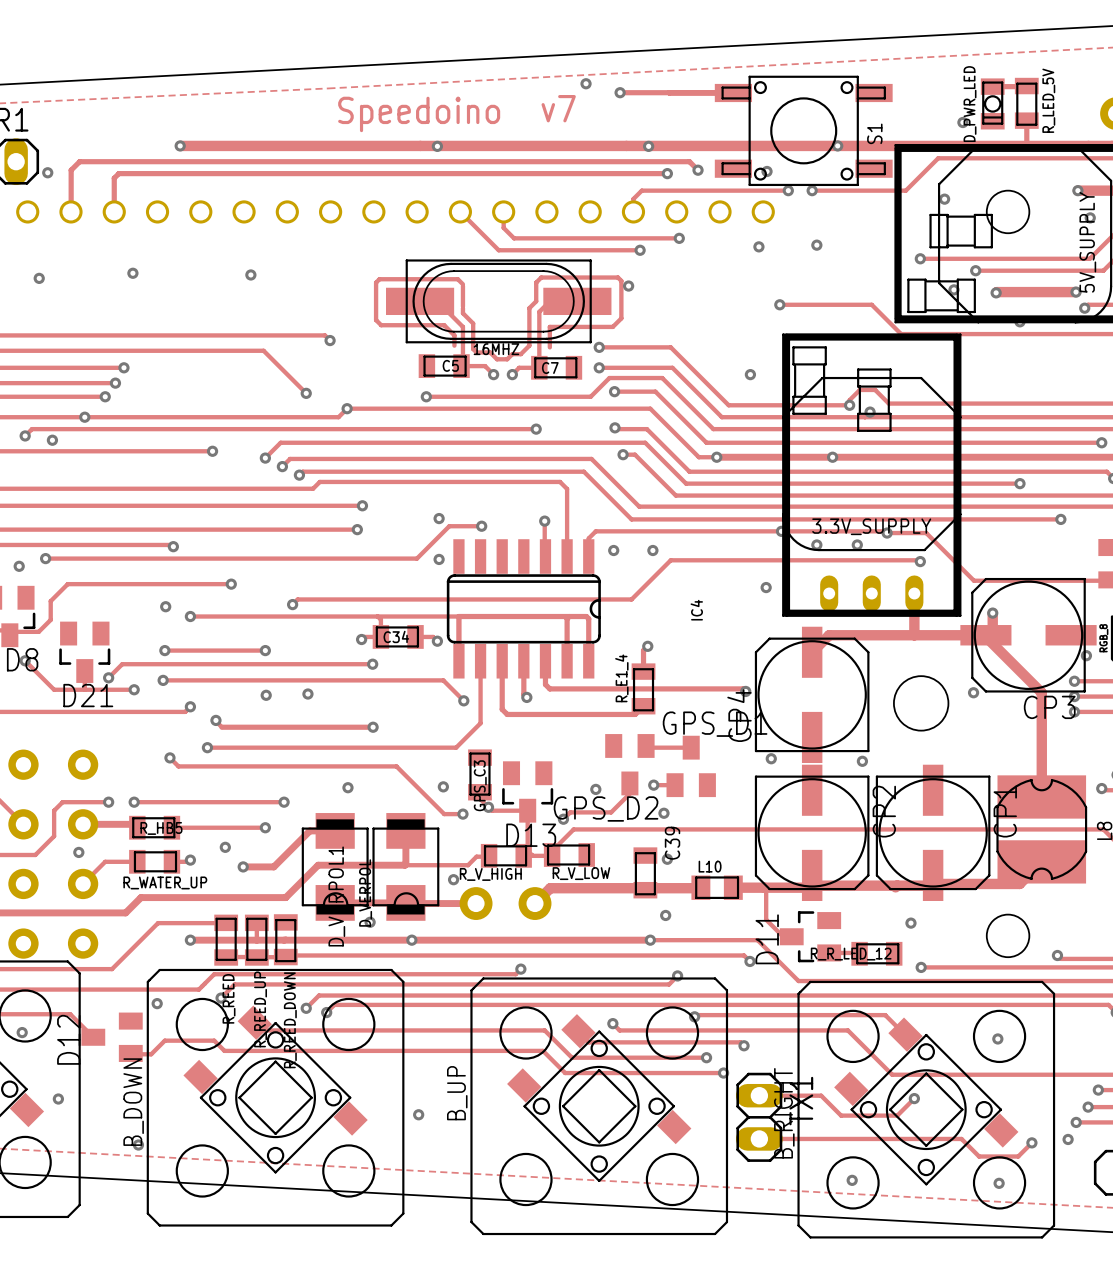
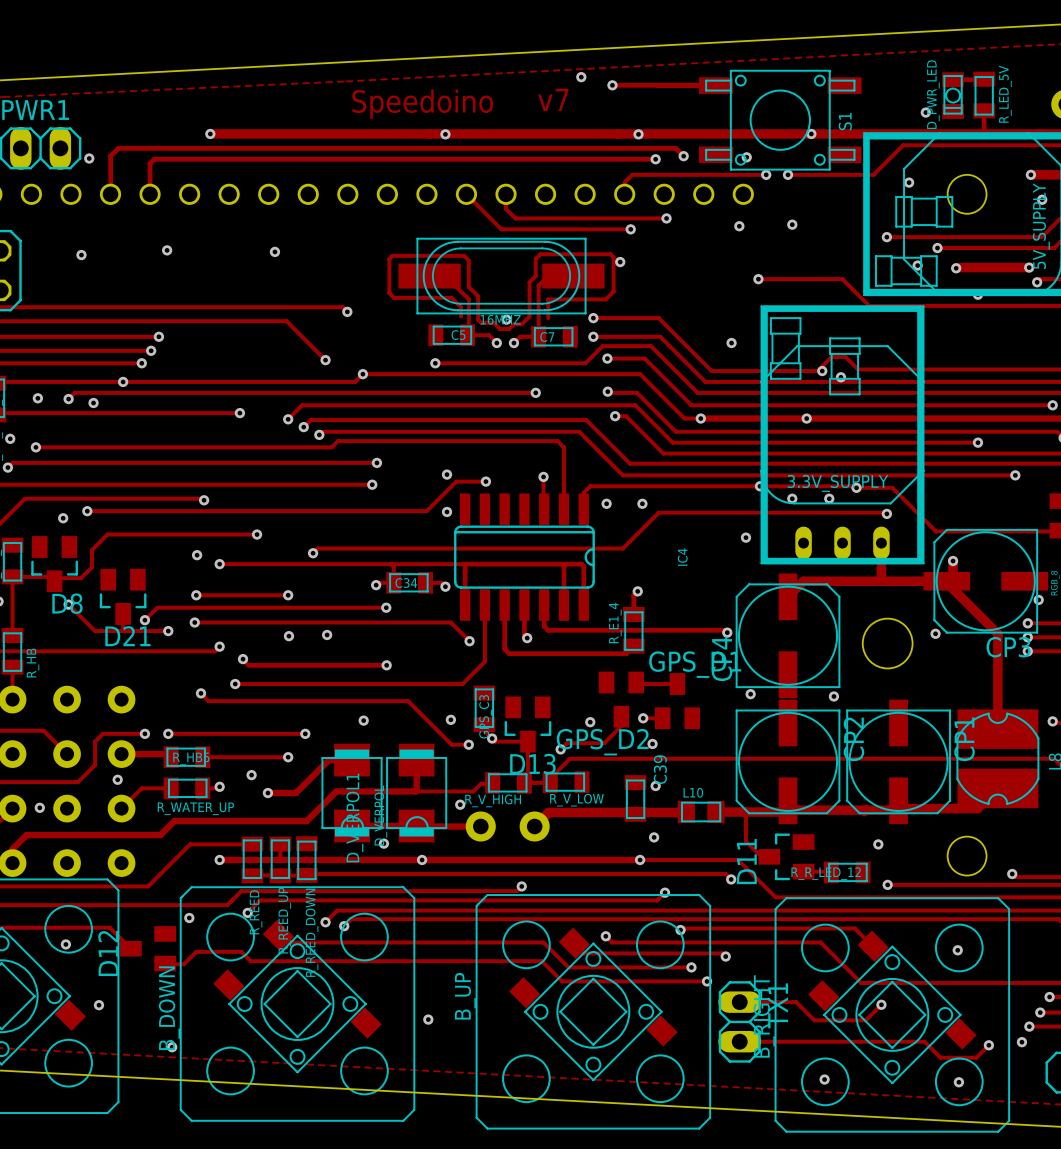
via: none -> (506, 319)

